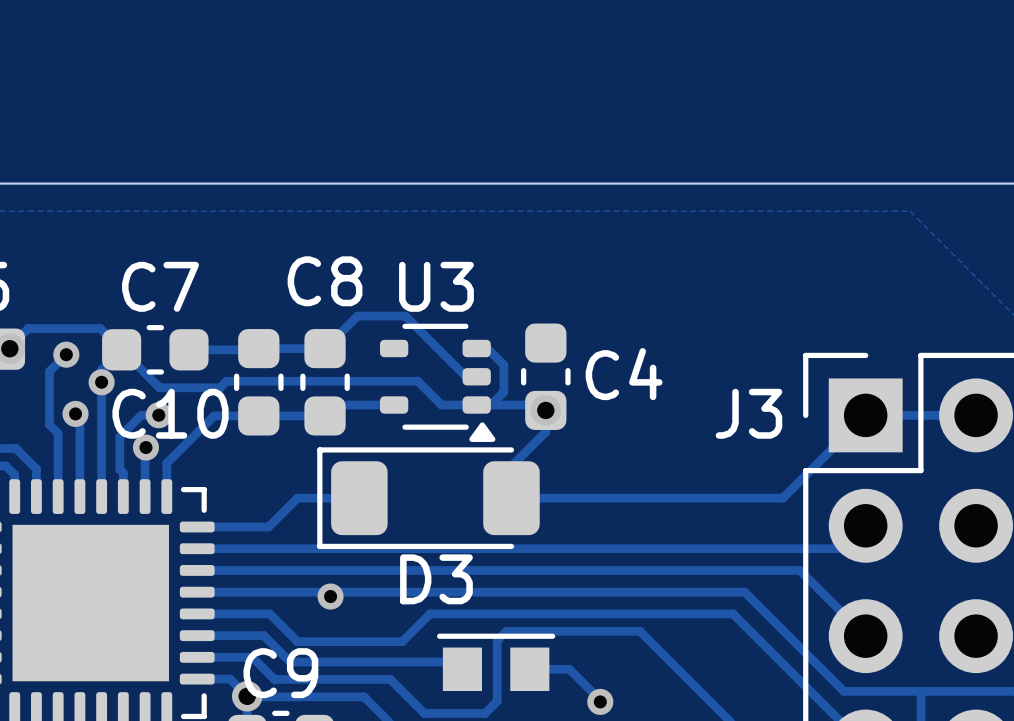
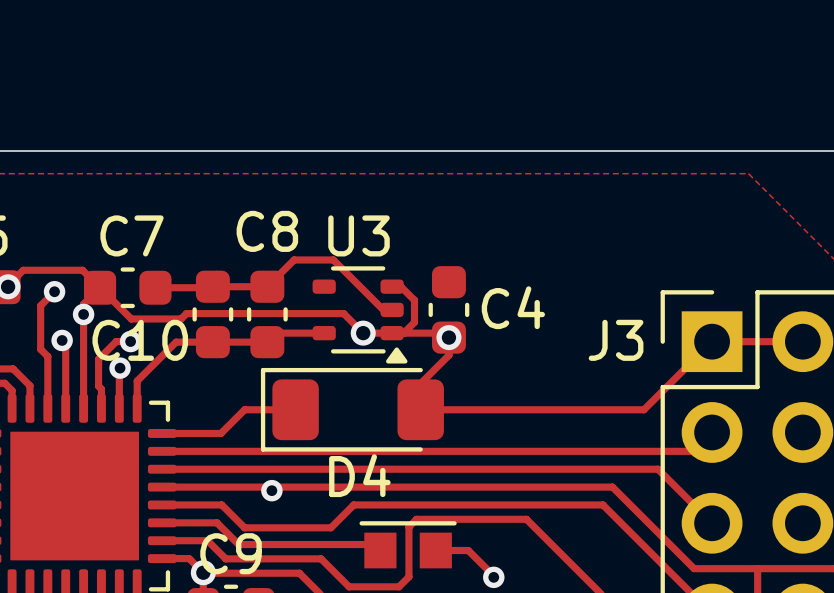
via: none -> (363, 333)
D3 name: D3 (436, 579) -> D4 (359, 475)

